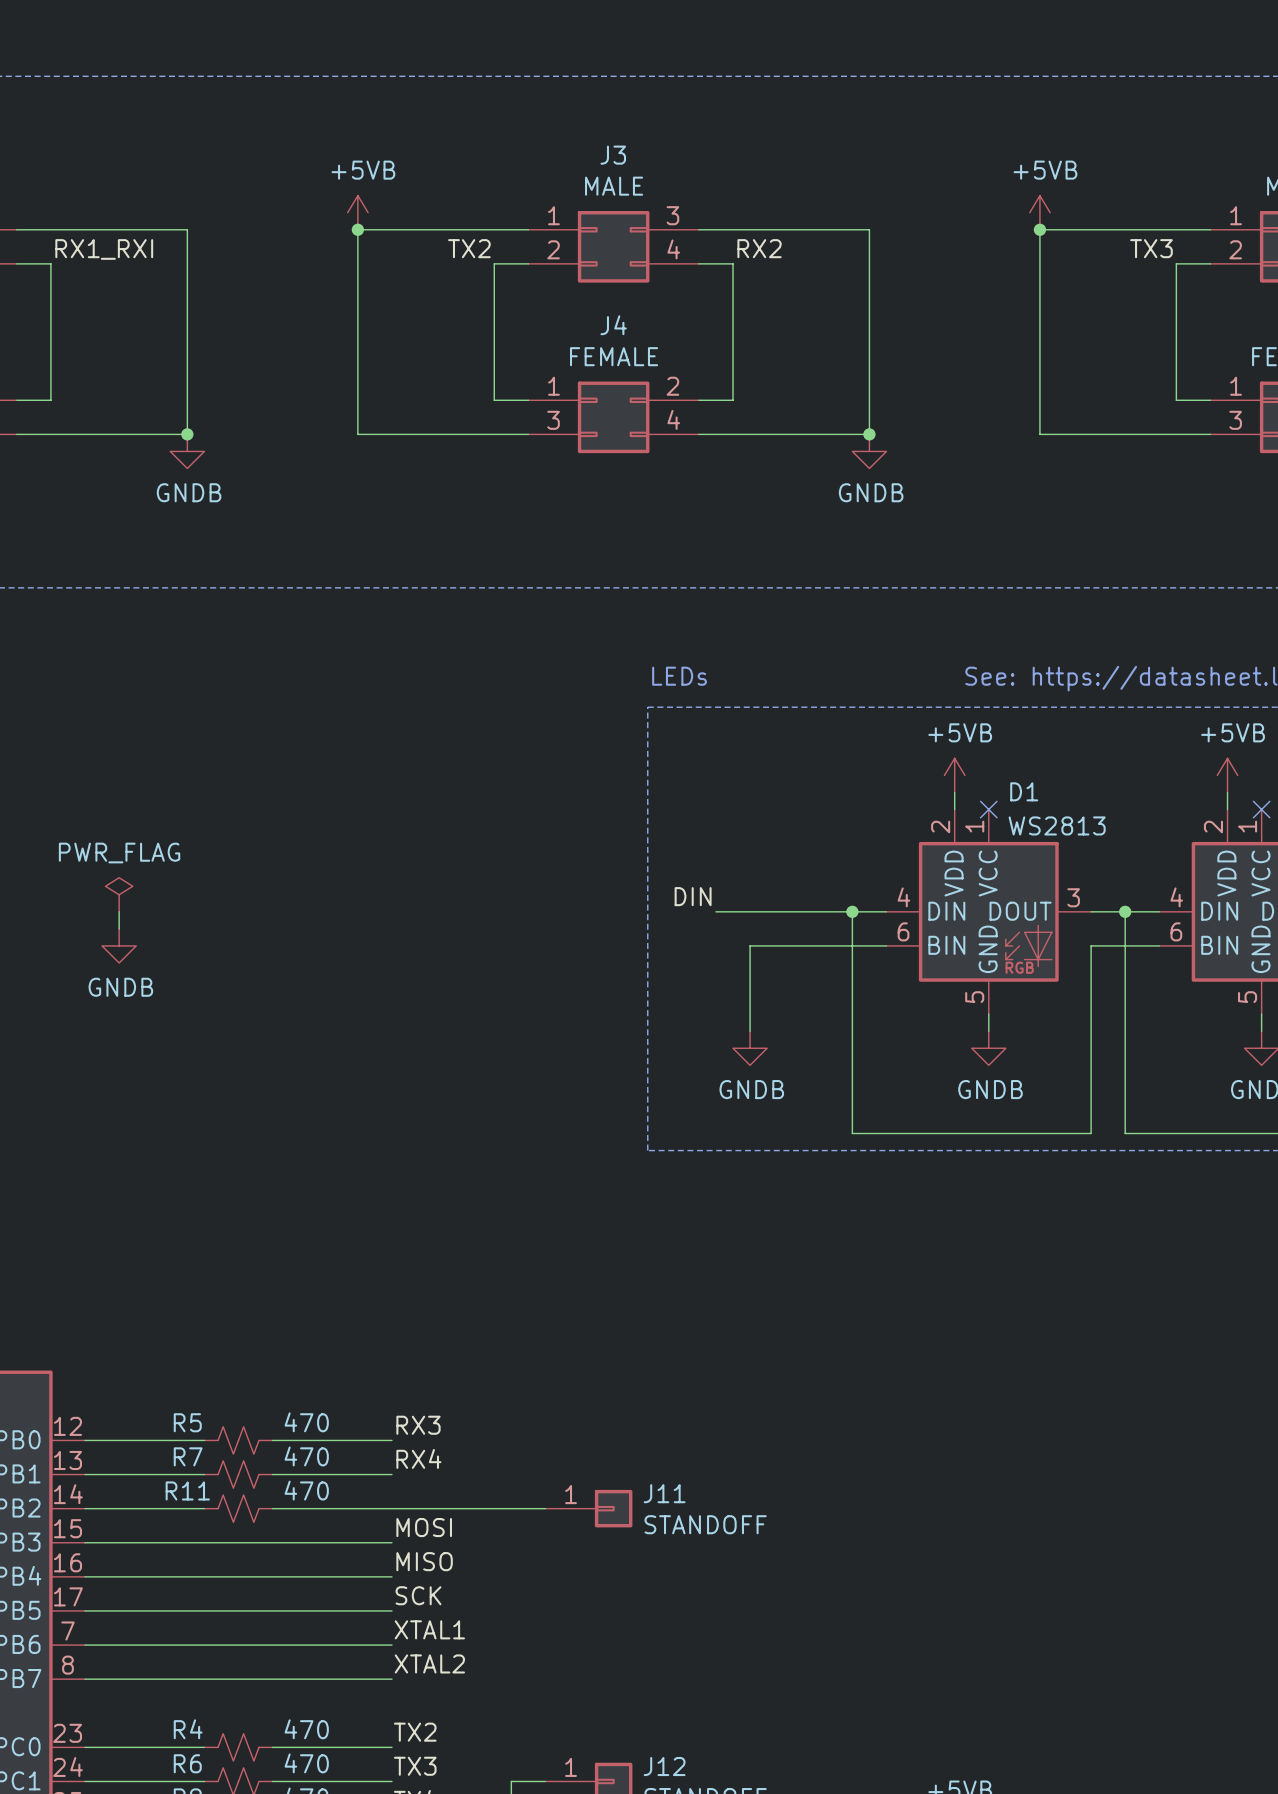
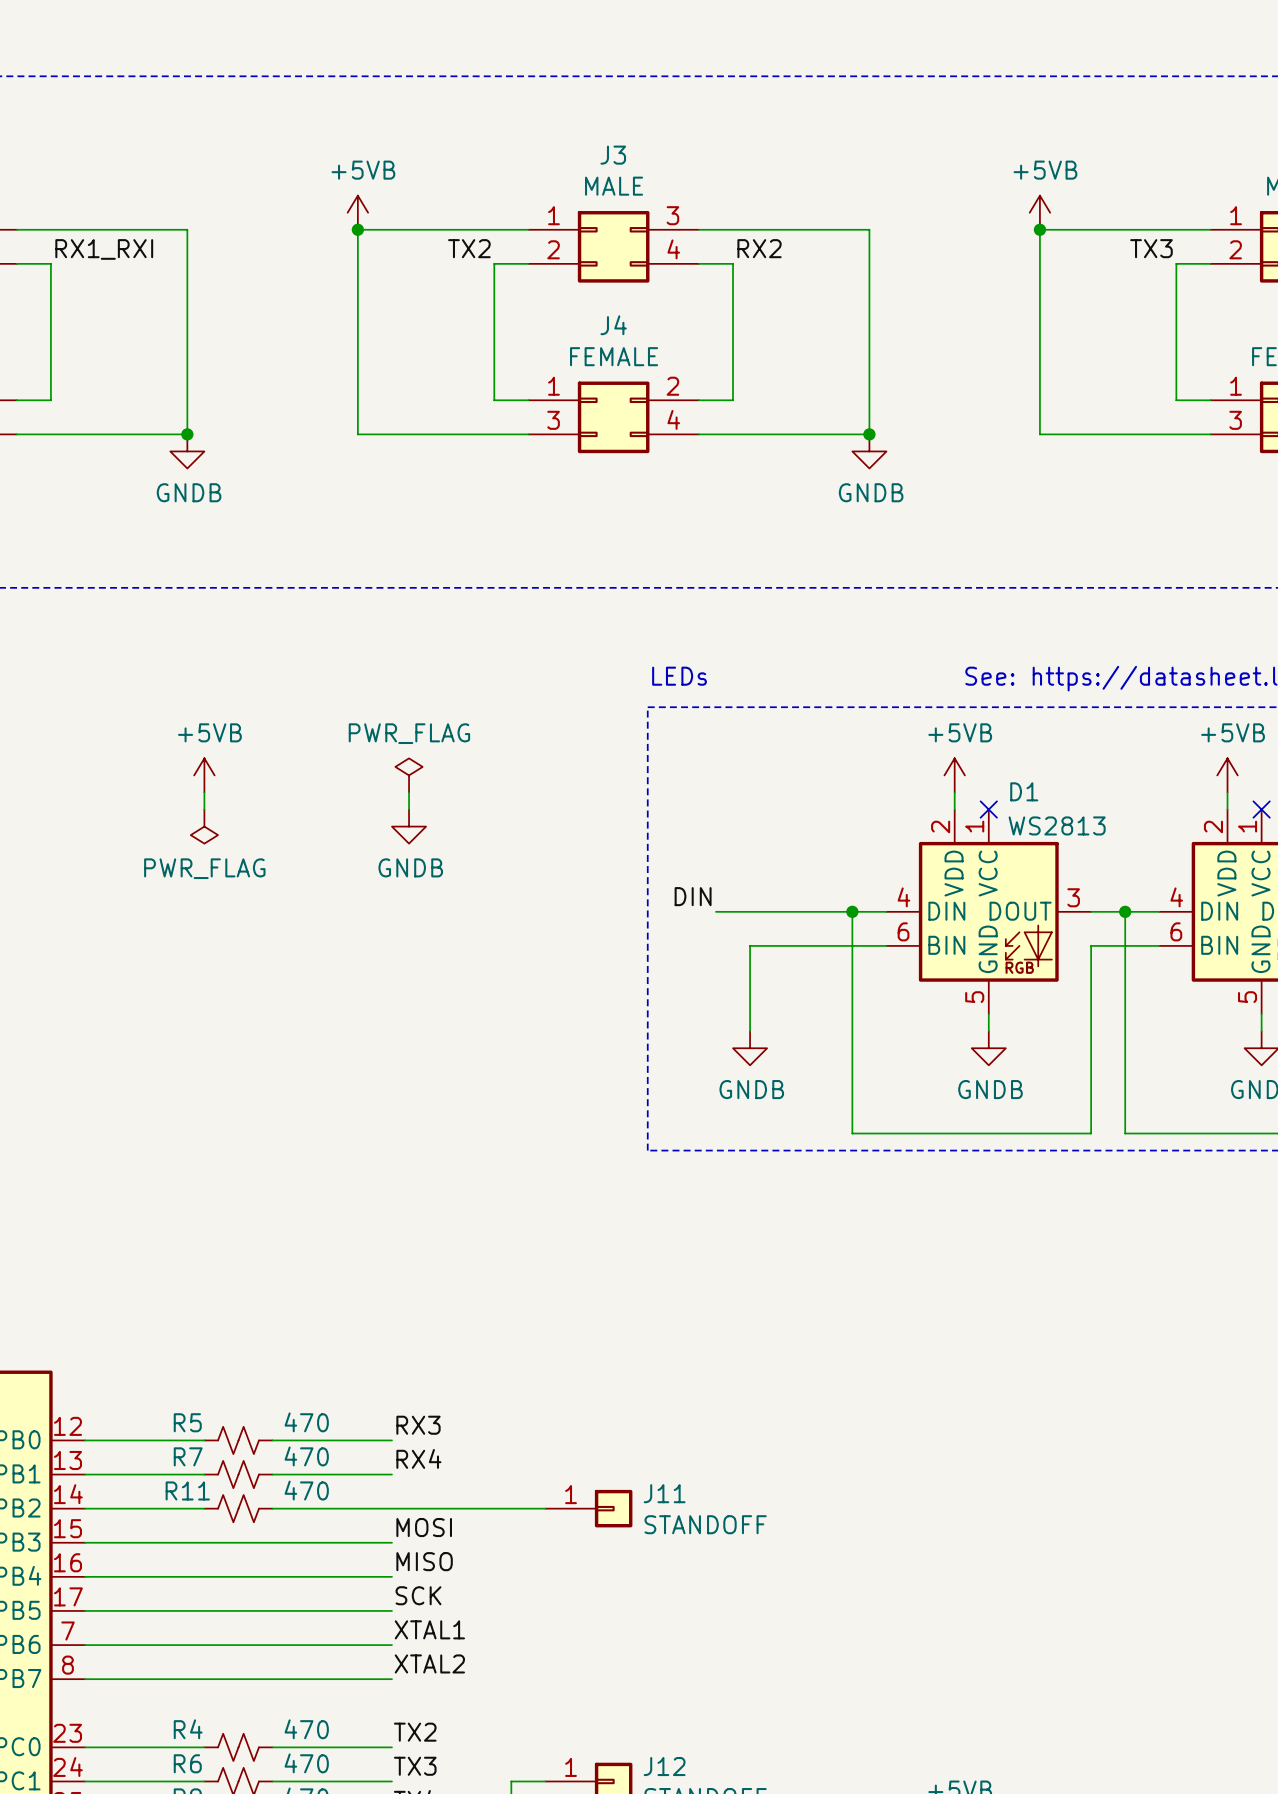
power symbol: none -> +5VB (204, 775)
power symbol: none -> PWR_FLAG (409, 775)
wire: none -> (409, 792) (409, 809)
power symbol rotation: 0° (119, 894) -> 180° (204, 826)
power symbol position: PWR_FLAG (119, 894) -> PWR_FLAG (204, 826)
wire: (119, 911) (119, 928) -> (204, 792) (204, 809)
power symbol position: GNDB (119, 945) -> GNDB (409, 826)

